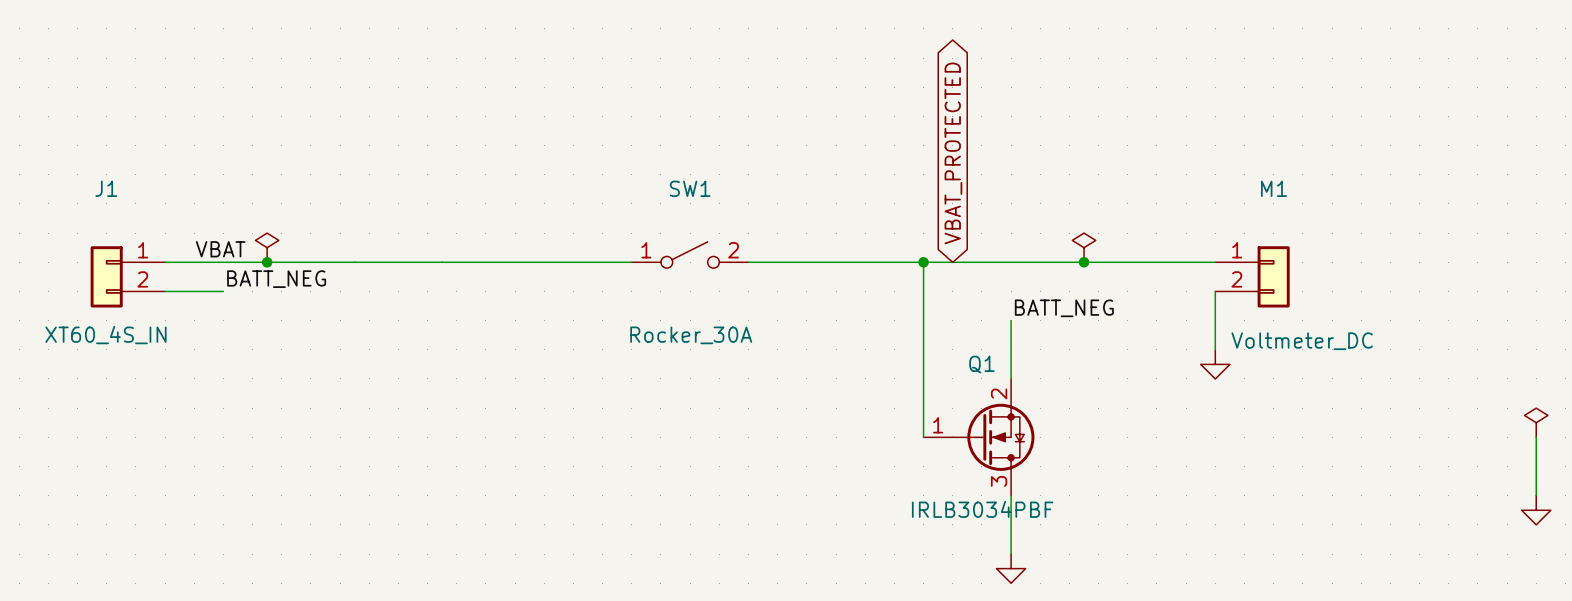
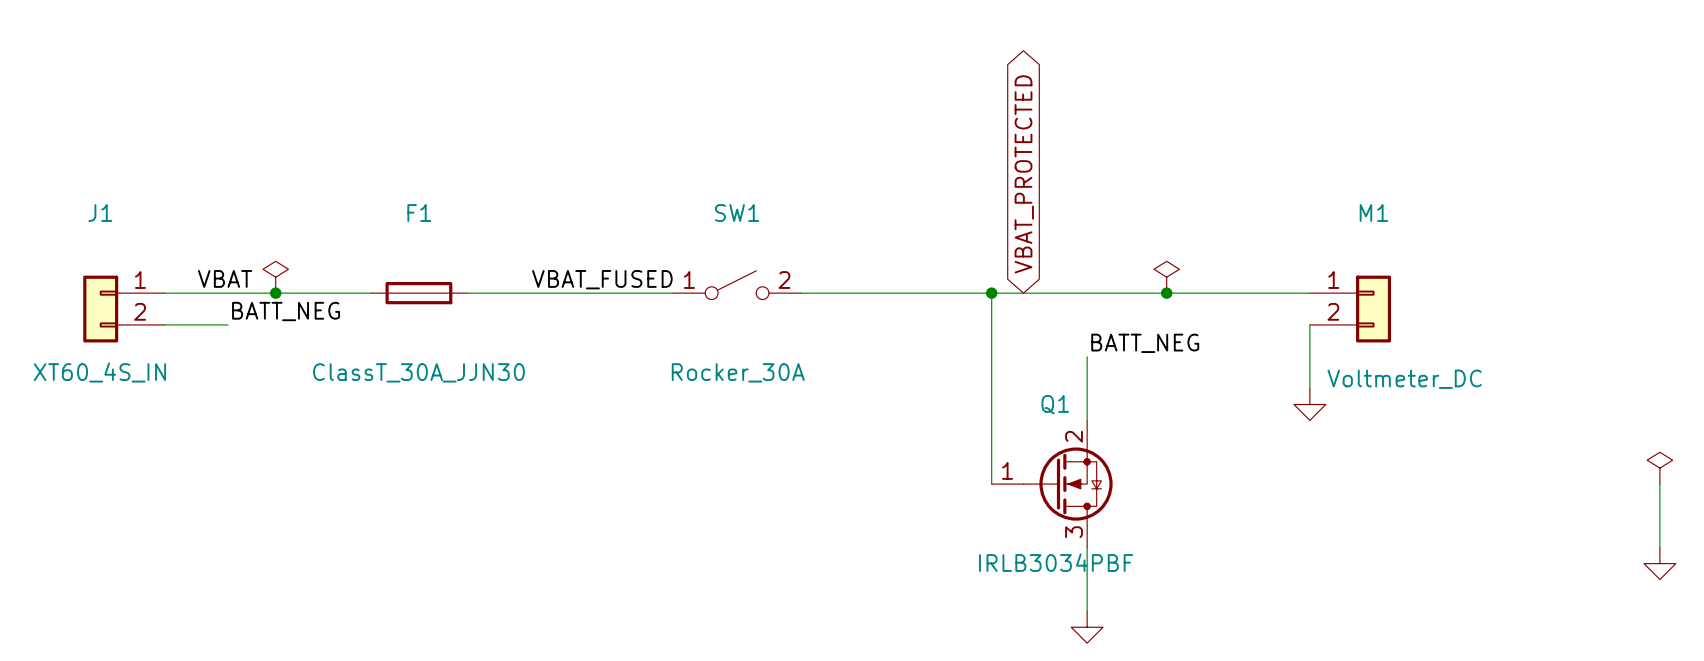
label: none -> VBAT_FUSED (602, 279)
F1: none -> ClassT_30A_JJN30 (418, 293)

